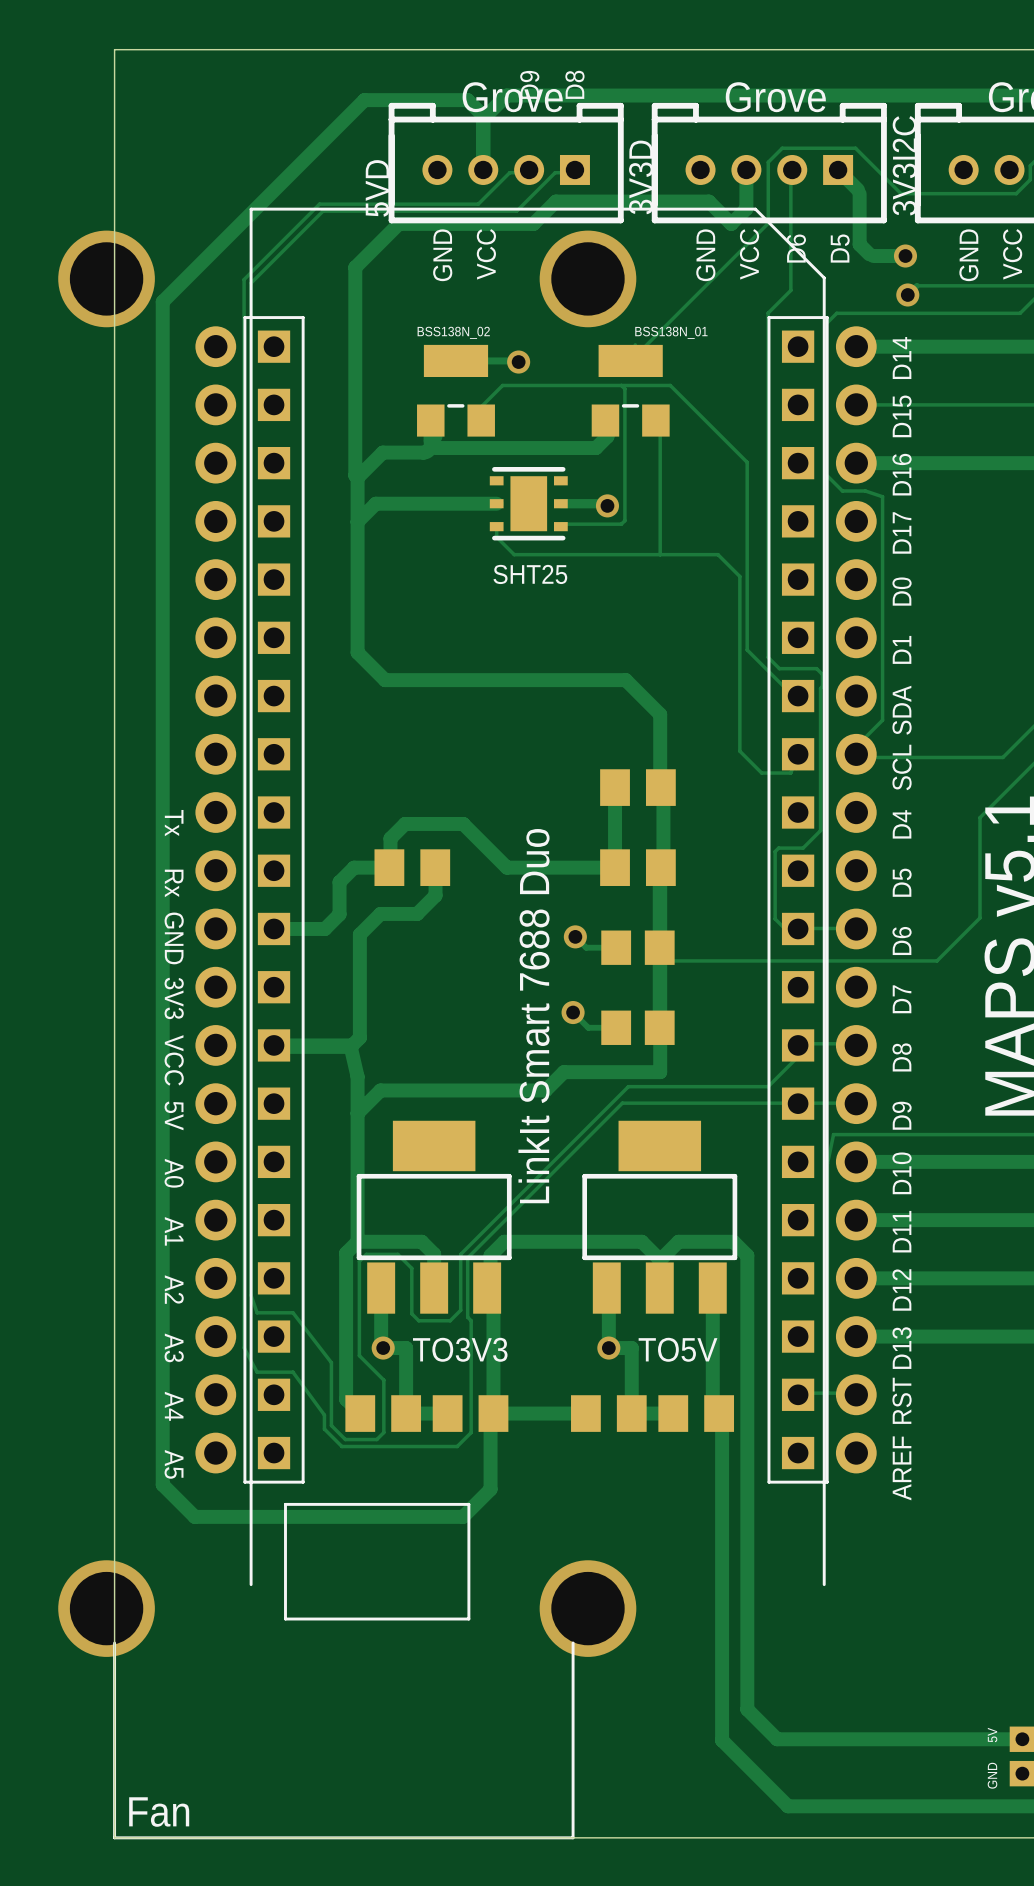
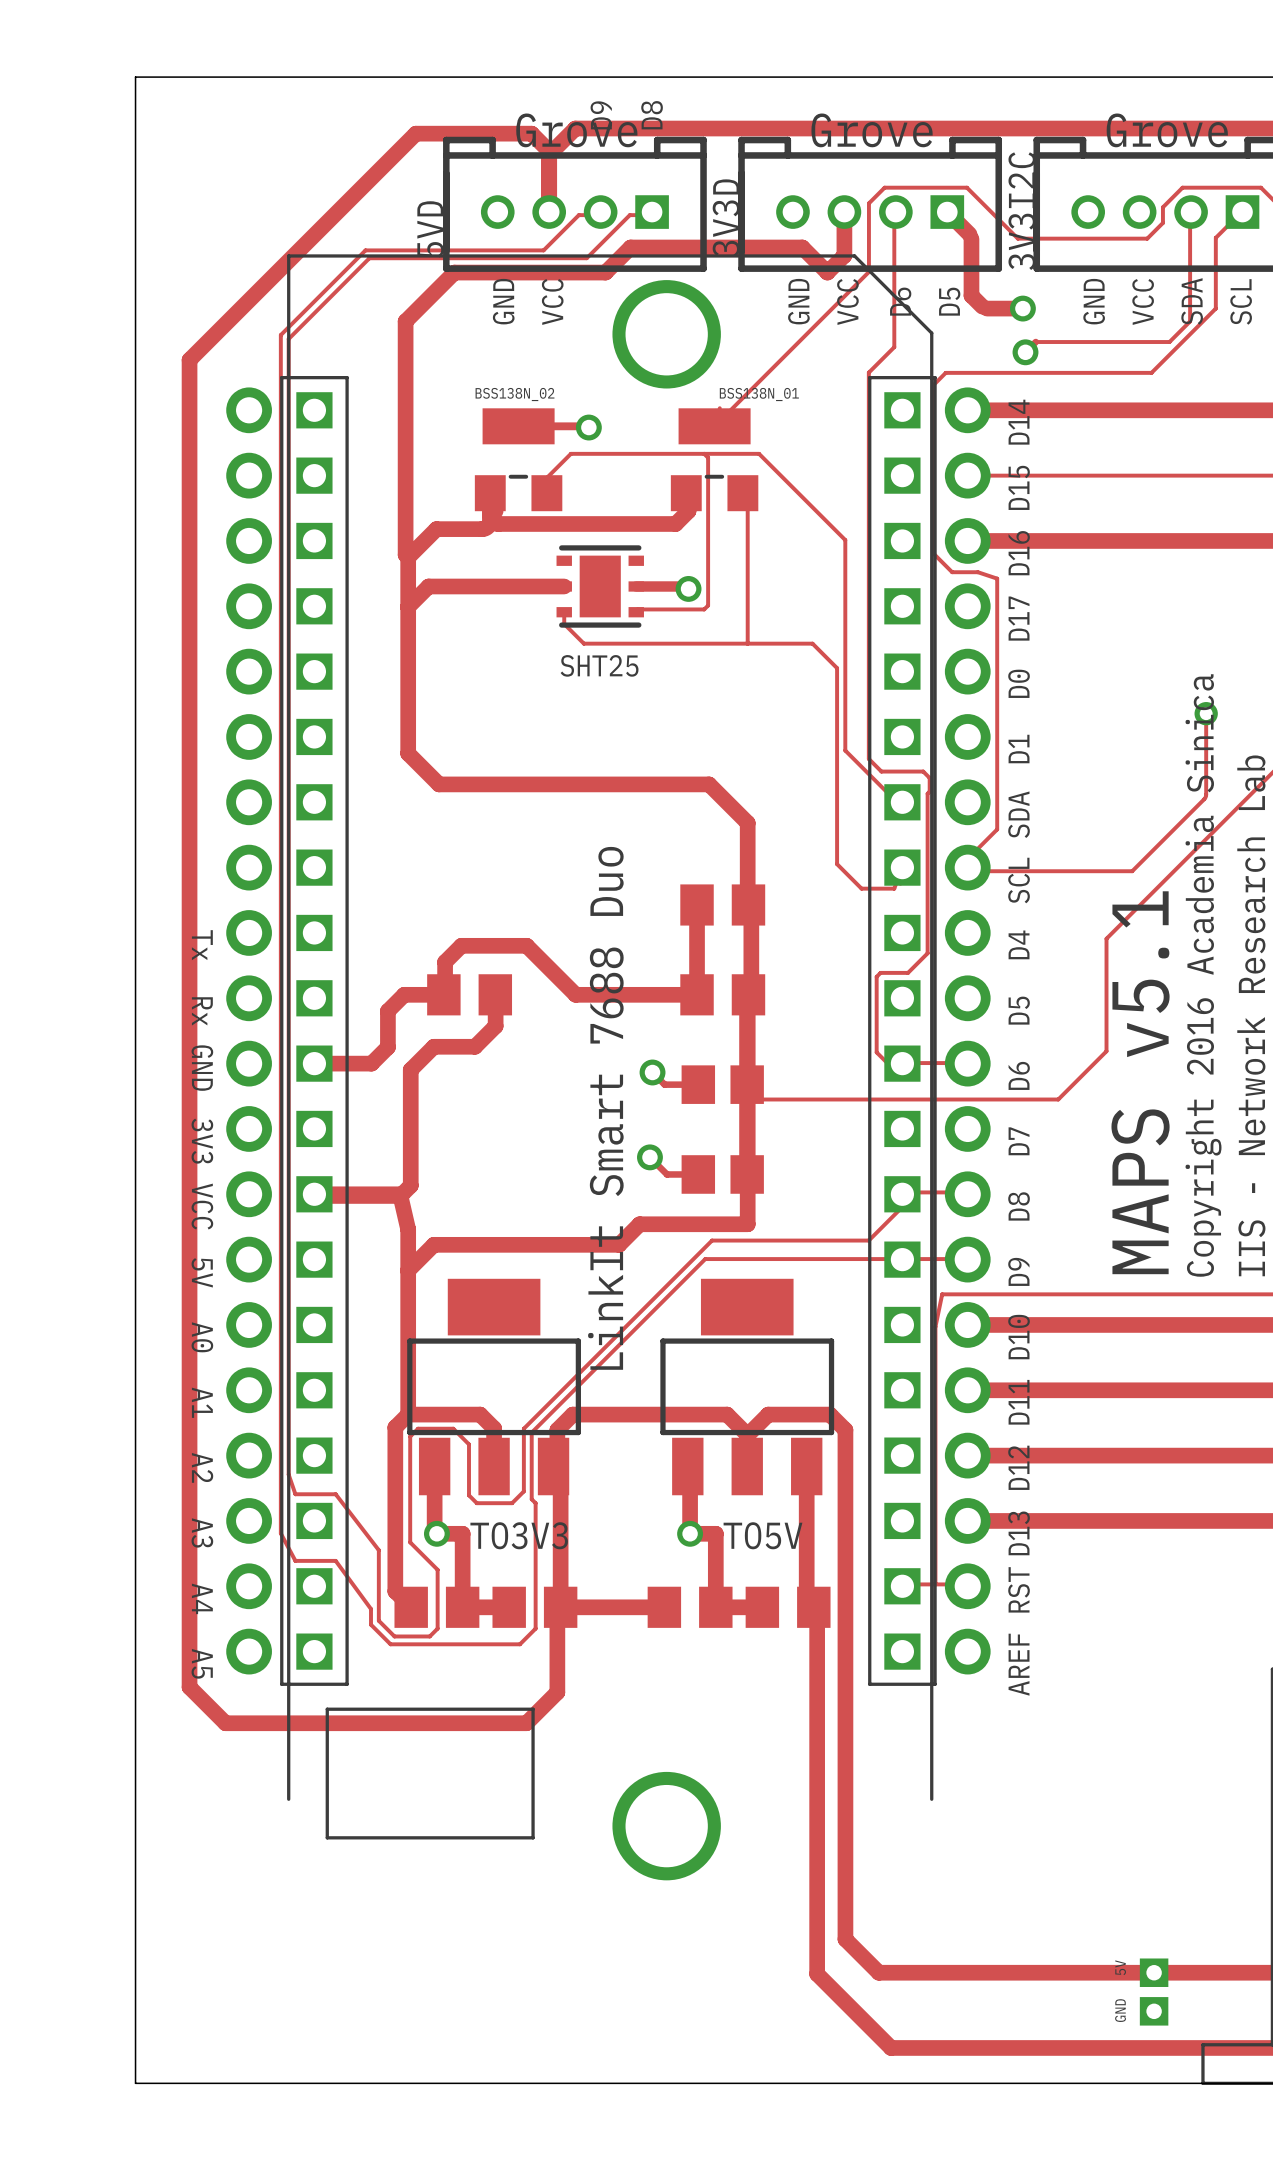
via: (106, 278) -> none
via: (106, 1608) -> none
drawing: [113, 1641, 575, 1840] -> none

